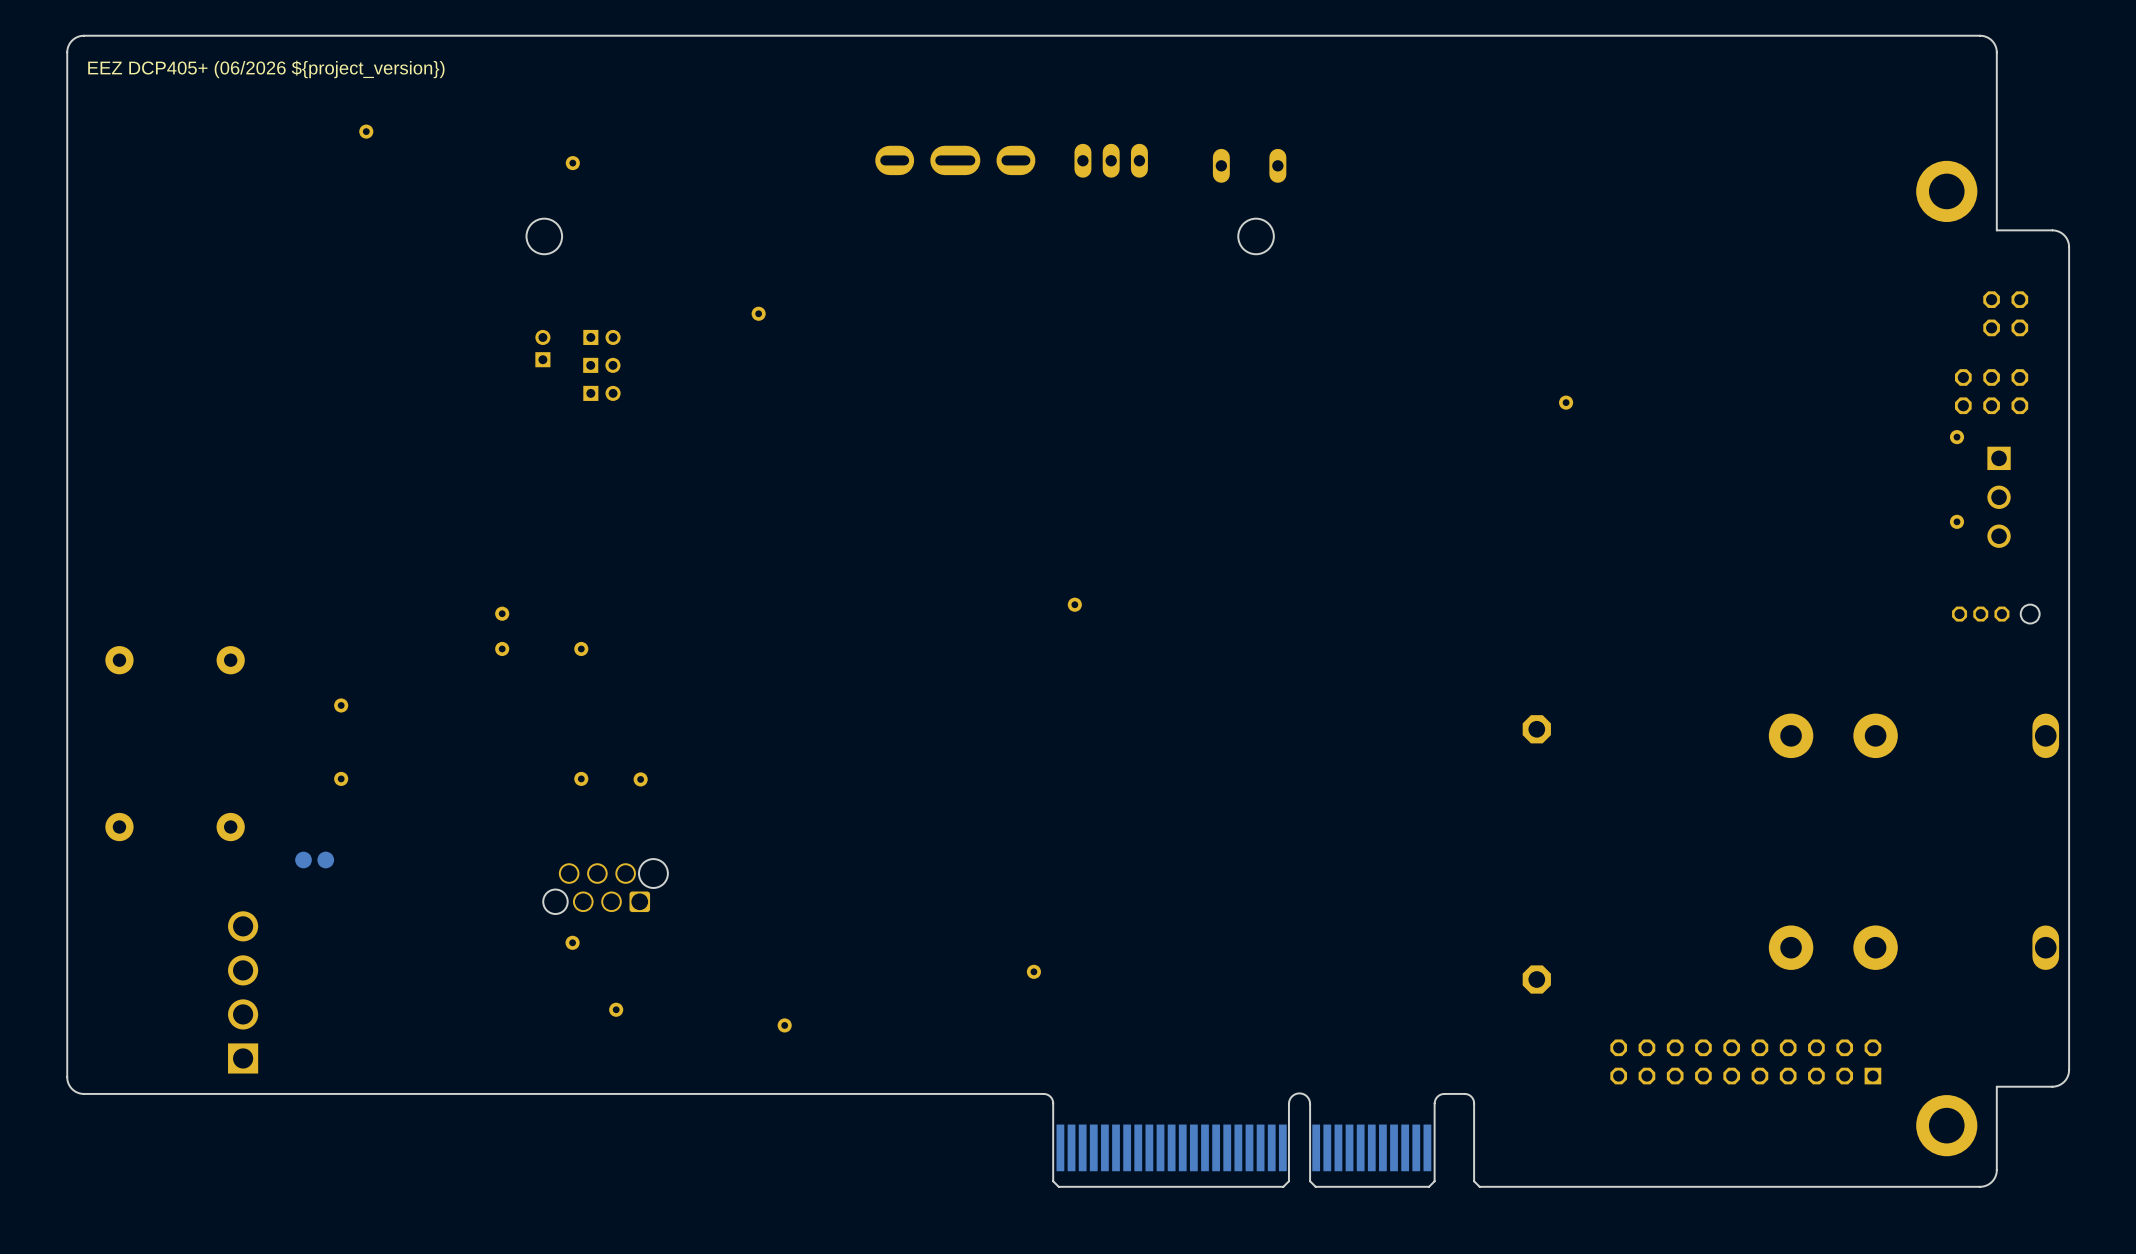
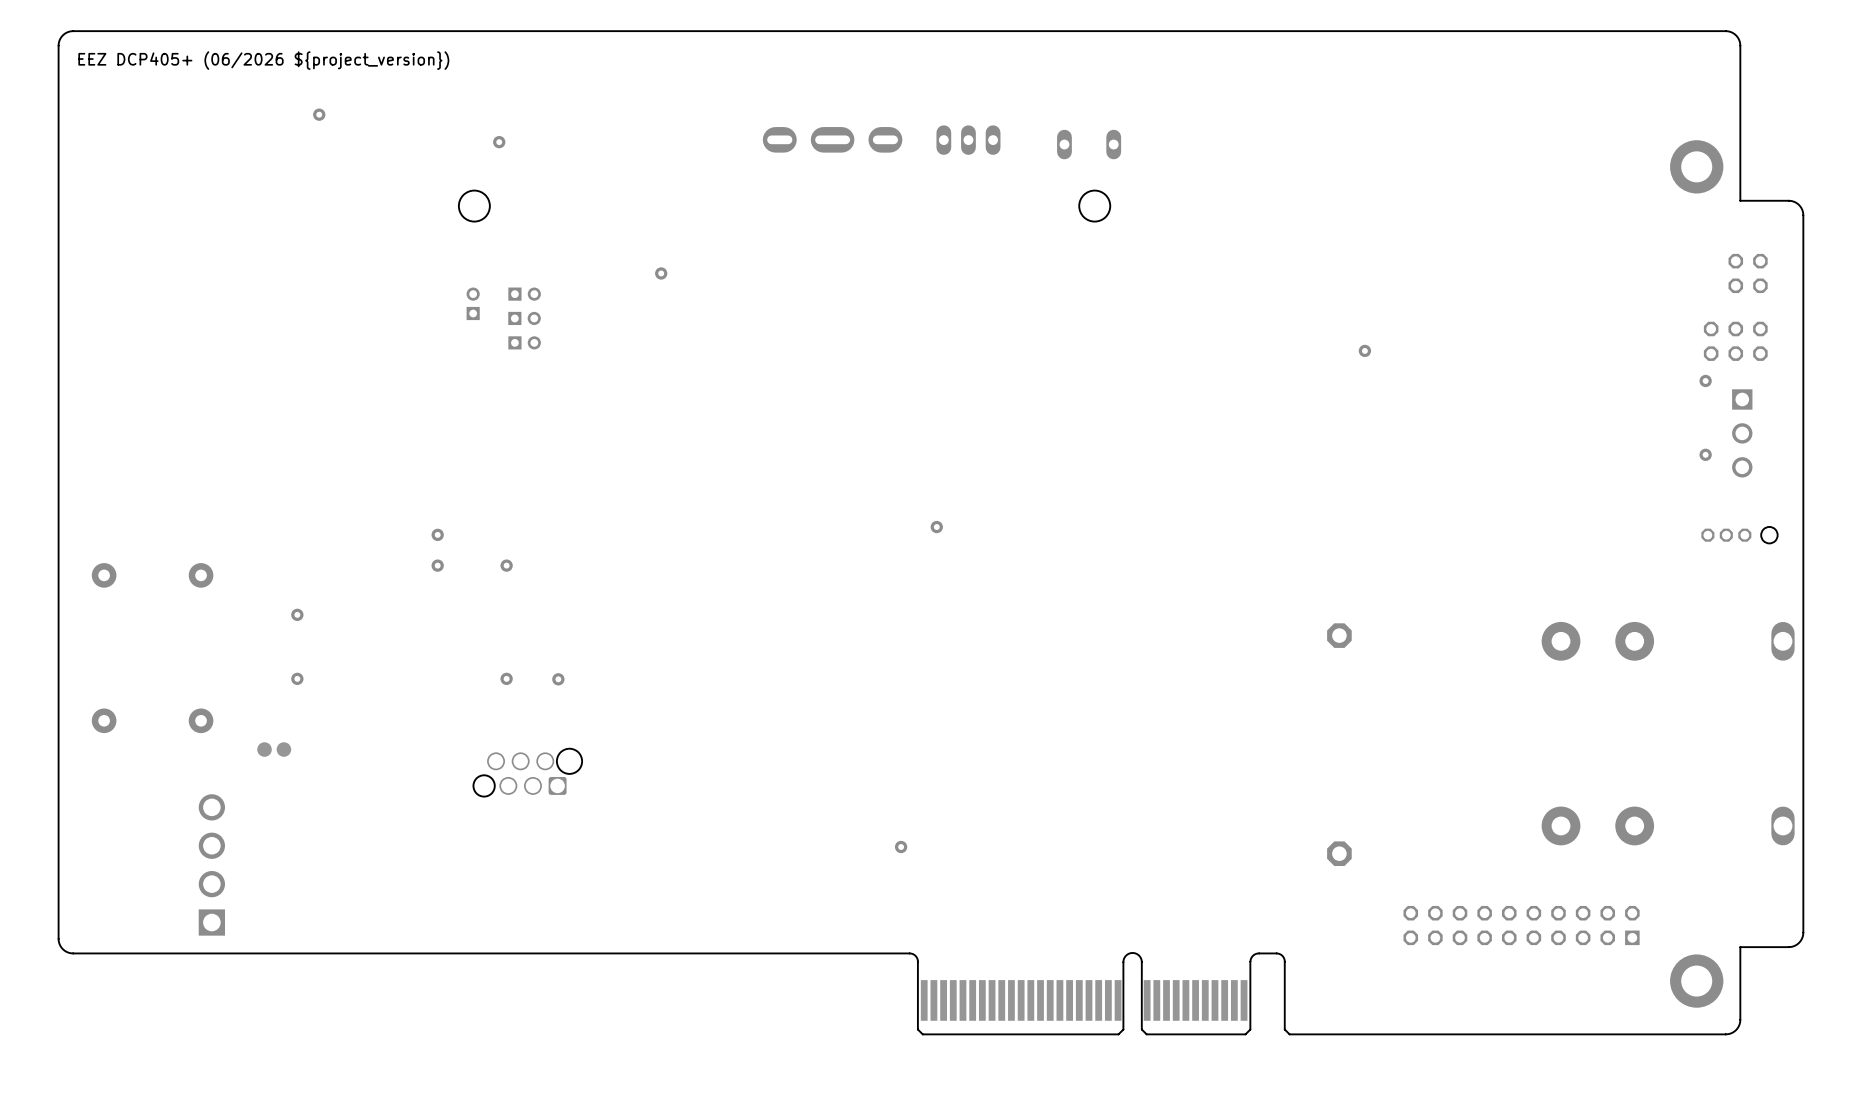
part: (572, 942) -> none
part: (616, 1009) -> none
part: (784, 1025) -> none

